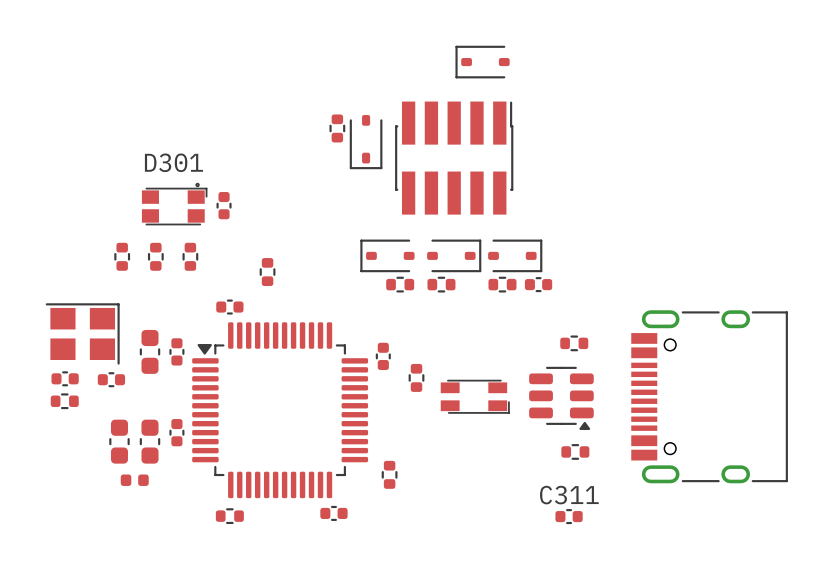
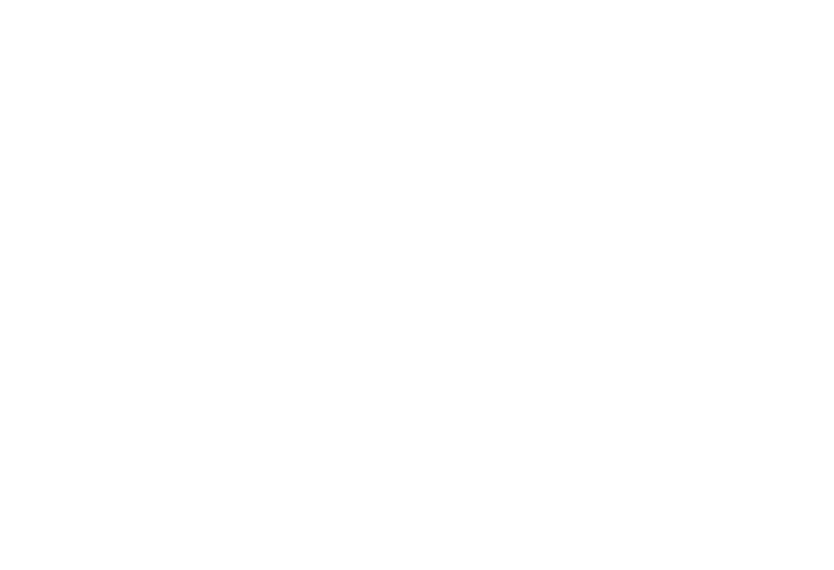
part: (482, 62) -> none
part: (337, 128) -> none
part: (366, 142) -> none
part: (454, 158) -> none
D301: (174, 204) -> none
part: (224, 205) -> none
part: (387, 255) -> none
part: (454, 255) -> none
part: (515, 255) -> none
part: (122, 256) -> none
part: (155, 256) -> none
part: (190, 256) -> none
part: (267, 272) -> none
part: (400, 284) -> none
part: (441, 284) -> none
part: (502, 284) -> none
part: (538, 284) -> none
part: (229, 307) -> none
part: (82, 333) -> none
part: (574, 343) -> none
part: (150, 351) -> none
part: (176, 351) -> none
part: (383, 356) -> none
part: (416, 377) -> none
part: (65, 378) -> none
part: (111, 379) -> none
part: (475, 396) -> none
part: (709, 396) -> none
part: (561, 398) -> none
part: (64, 401) -> none
part: (280, 410) -> none
part: (176, 432) -> none
part: (119, 441) -> none
part: (150, 441) -> none
part: (575, 451) -> none
part: (389, 474) -> none
part: (134, 480) -> none
part: (333, 513) -> none
part: (229, 516) -> none
C311: (569, 516) -> none

